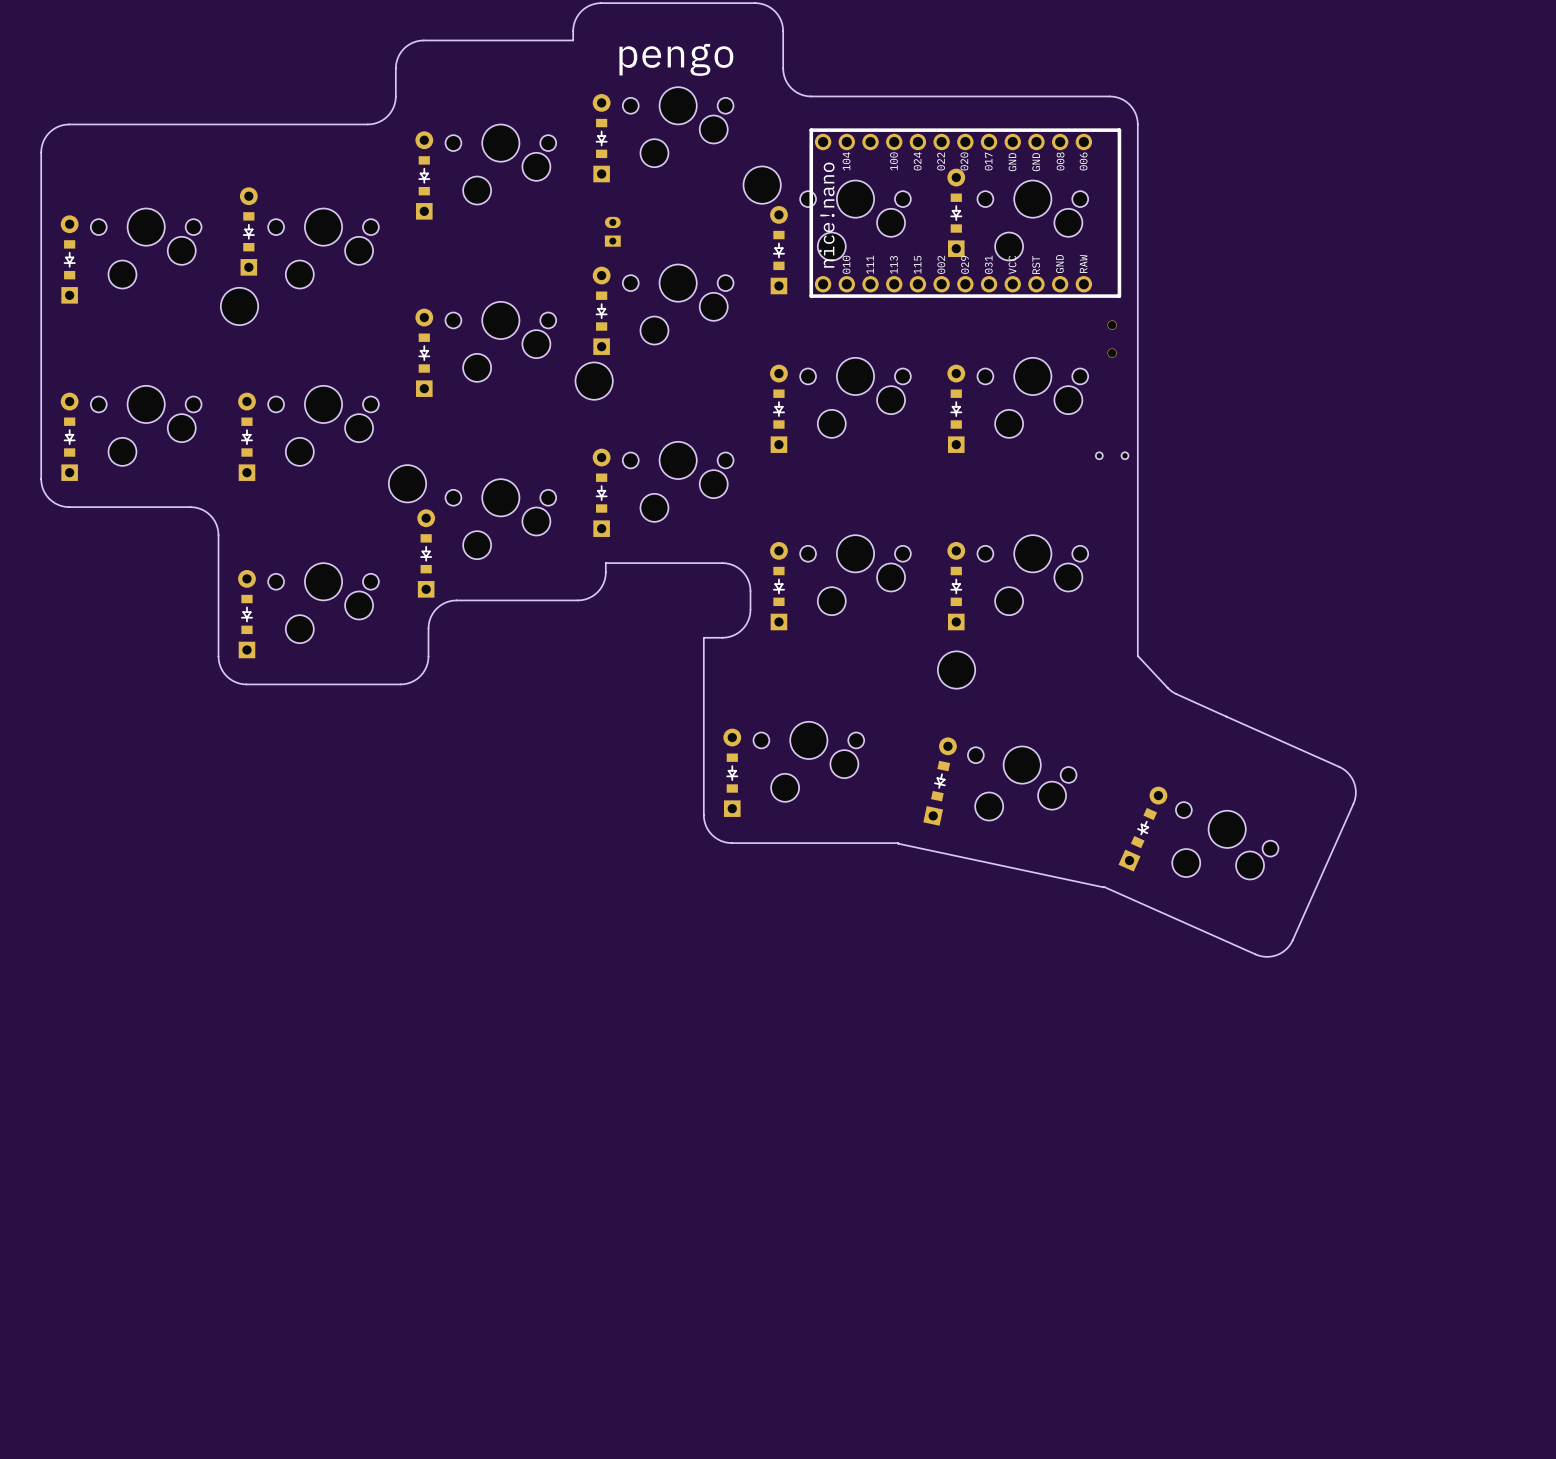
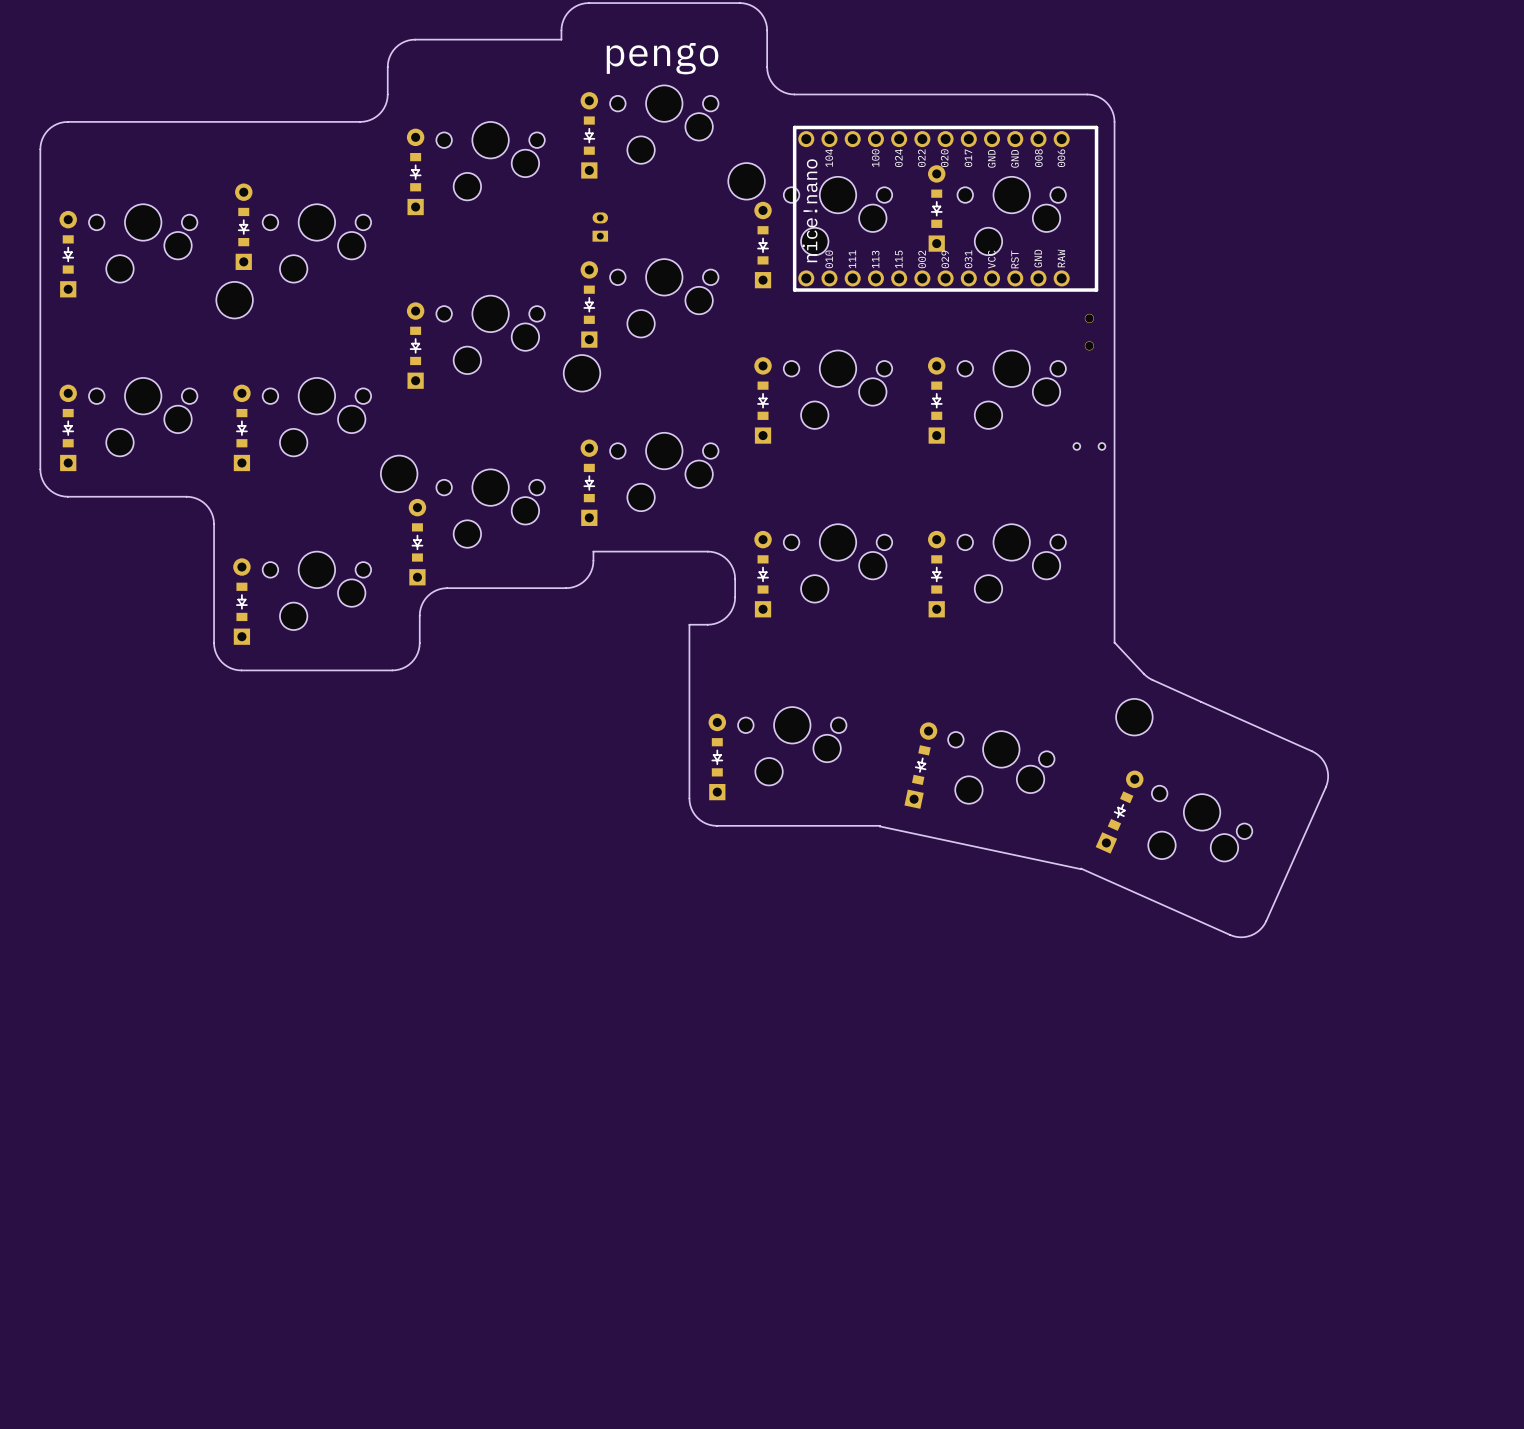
part position: (956, 670) -> (1134, 717)

